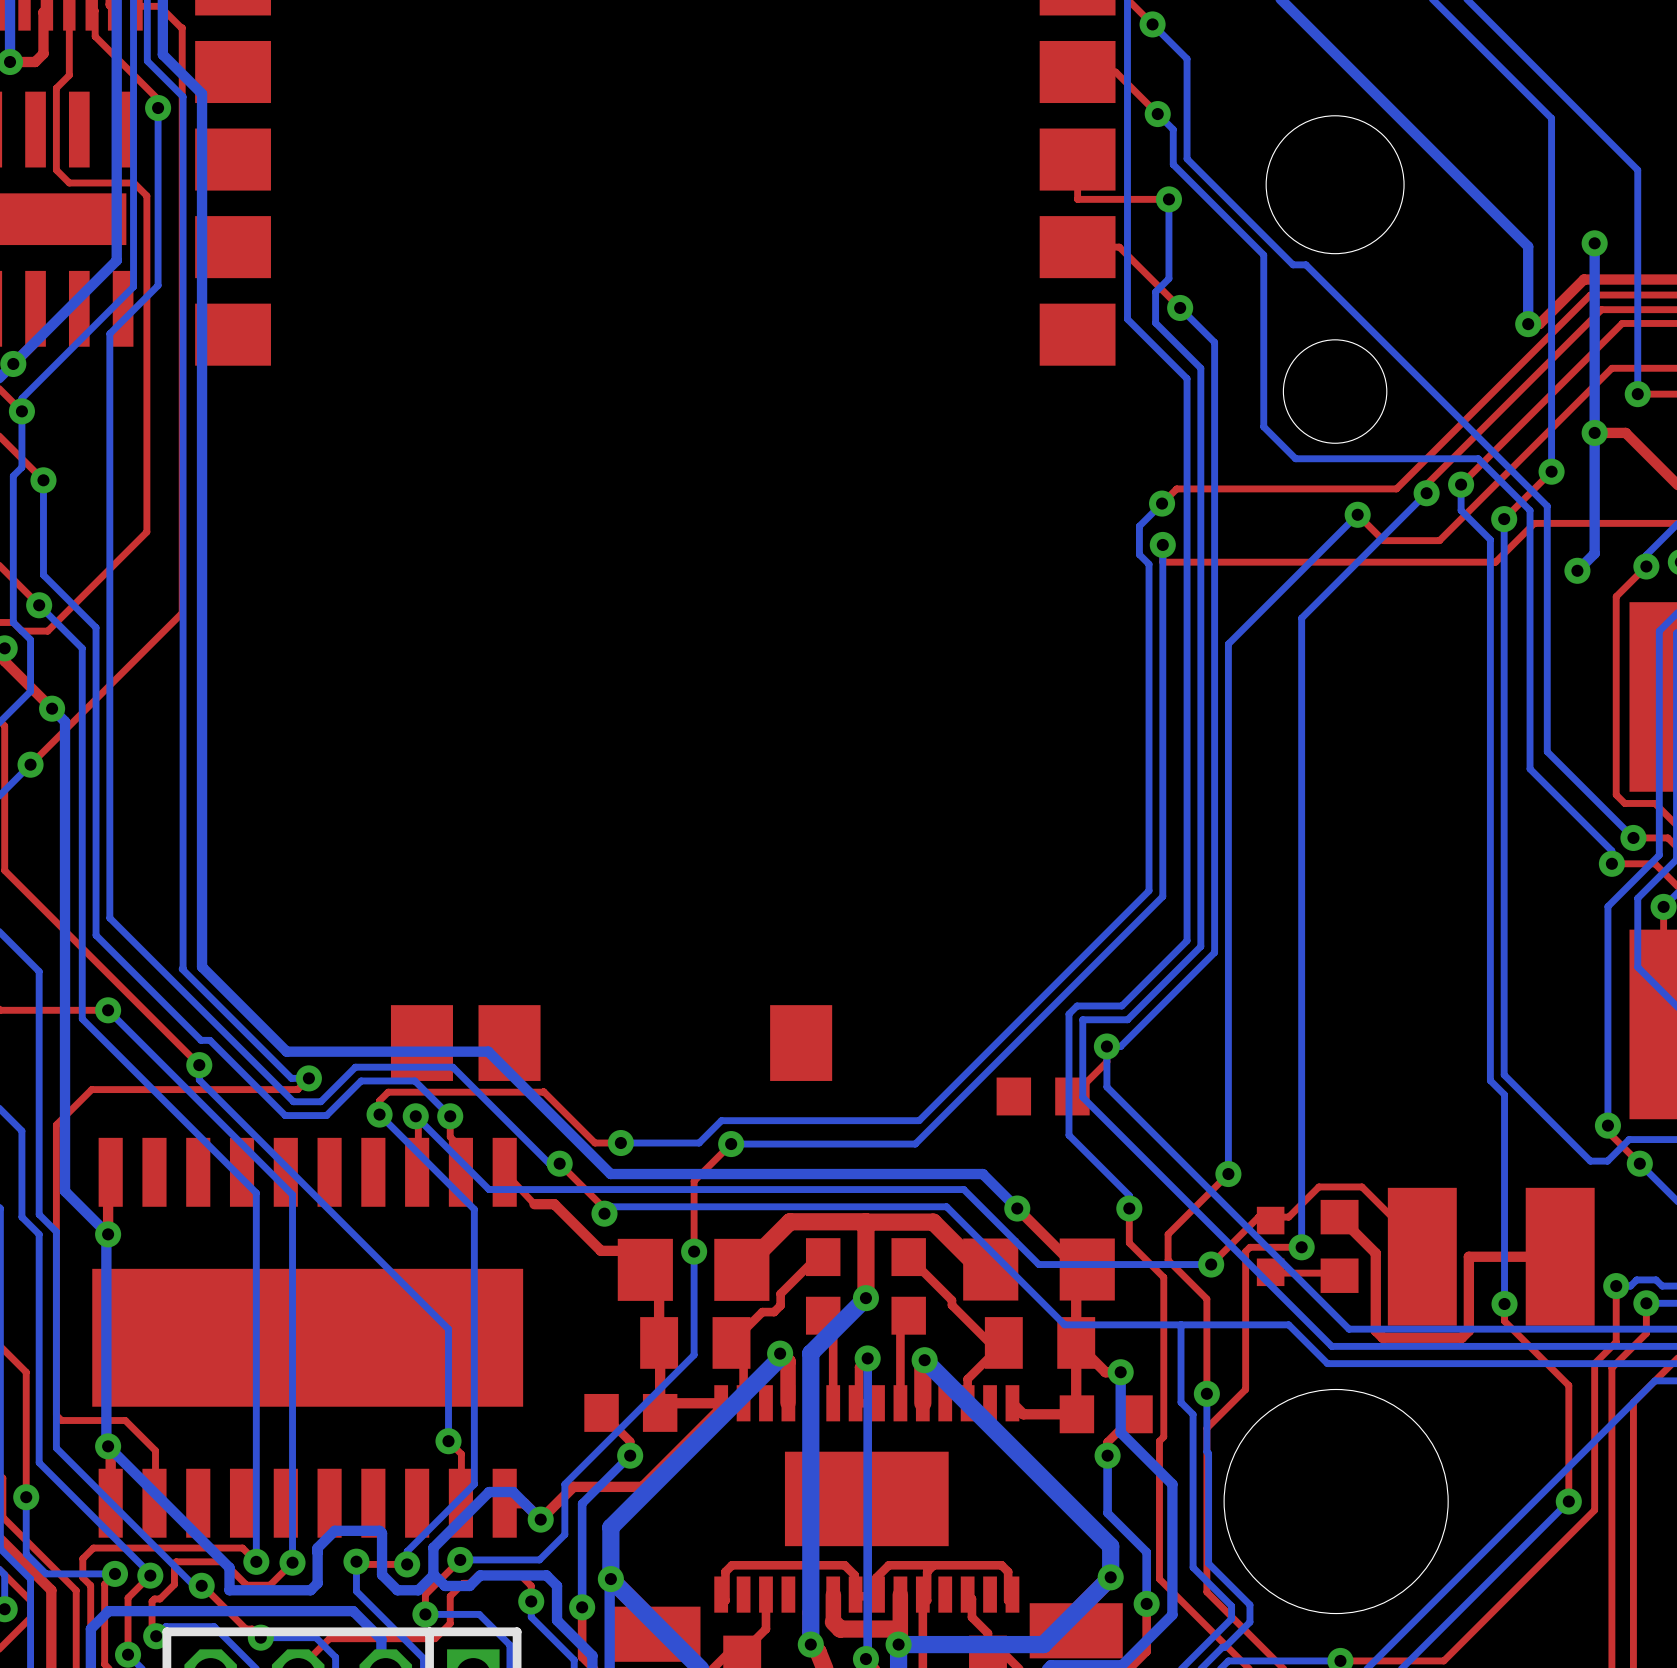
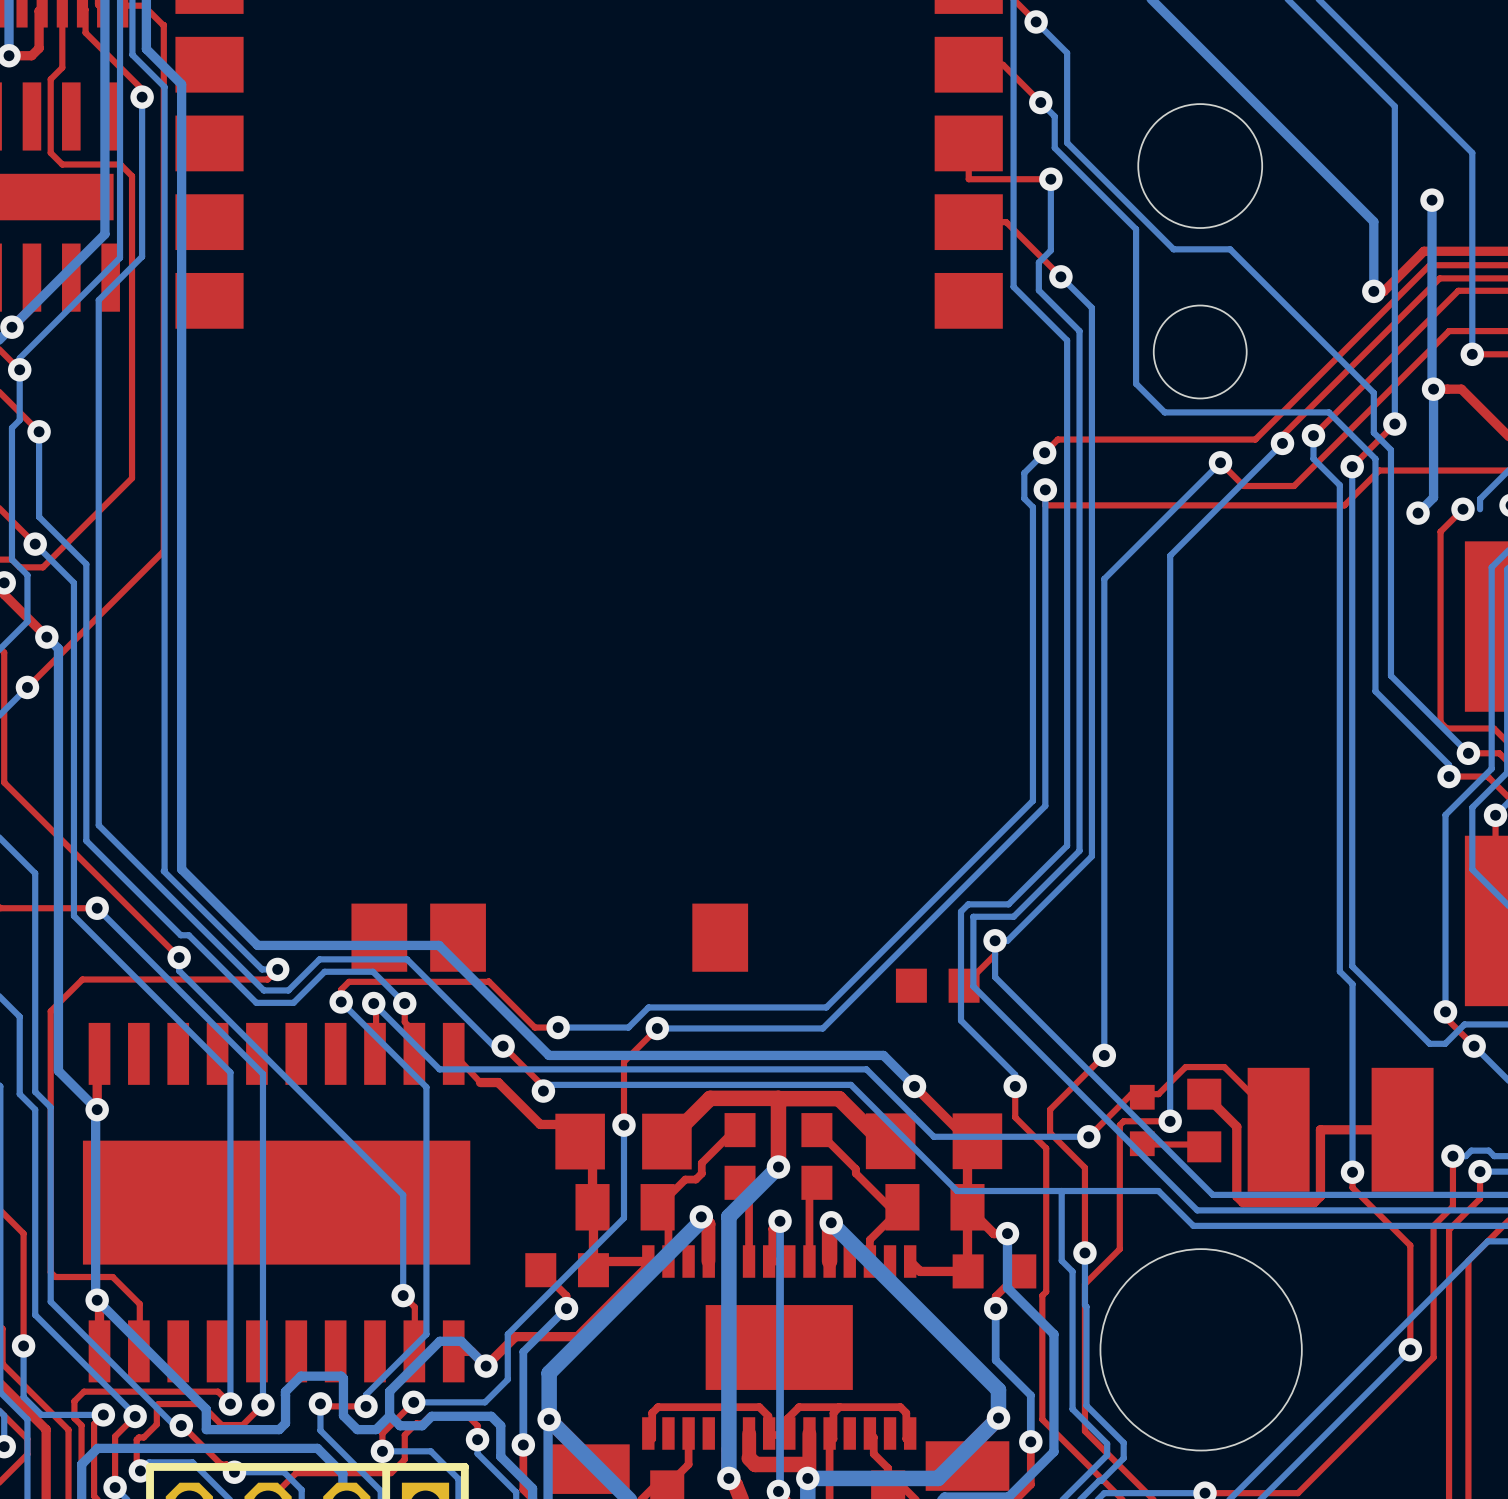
bottom track: (1594, 243) (1594, 432) -> (1432, 200) (1432, 387) (1433, 389)
via position: (1594, 243) -> (1432, 200)
bottom track: (1293, 264) (1305, 264) (1547, 506) -> (1162, 238) (1173, 249) (1230, 249) (1373, 392) (1373, 432) (1390, 449) (1390, 455)
top track: (1646, 566) (1616, 596) (1616, 794) (1624, 803) (1654, 803) (1661, 810) -> (1463, 509) (1440, 531) (1440, 722) (1446, 728) (1494, 728)
via position: (1646, 566) -> (1463, 509)

